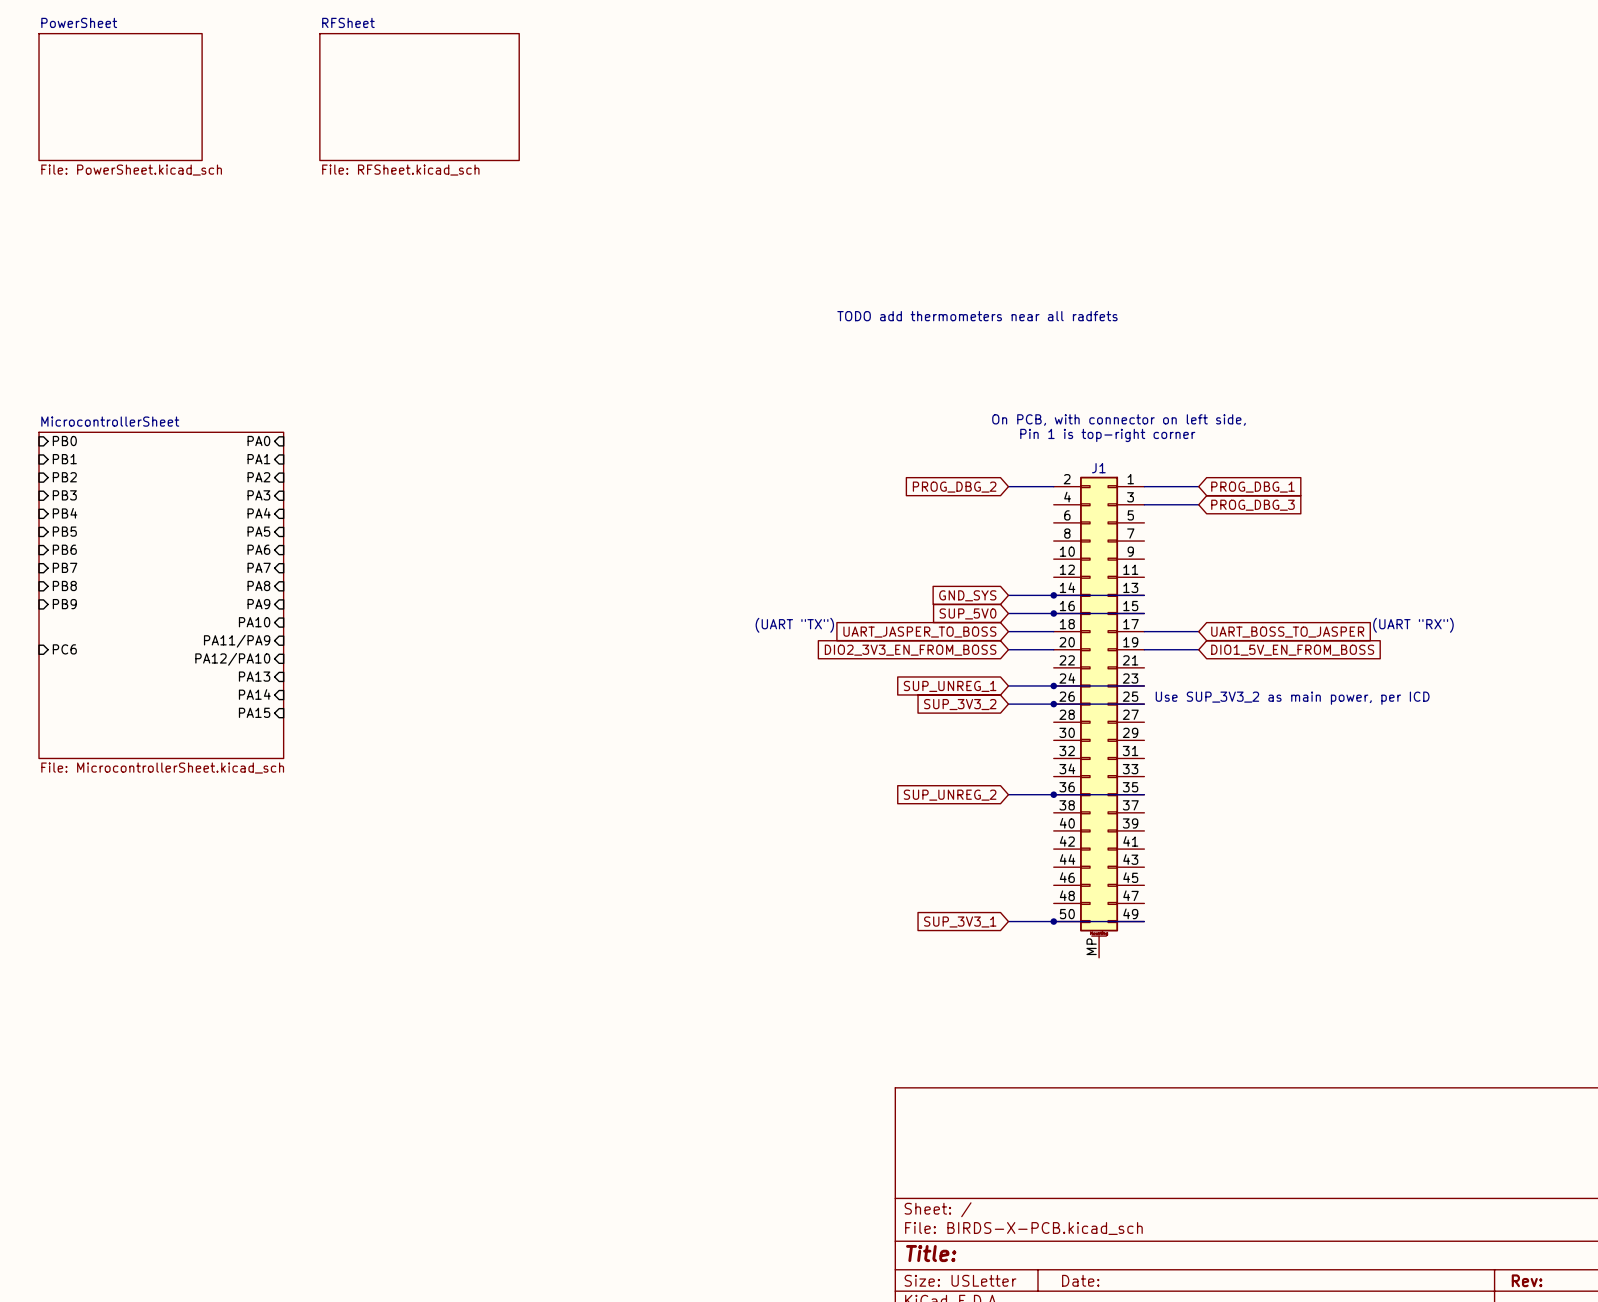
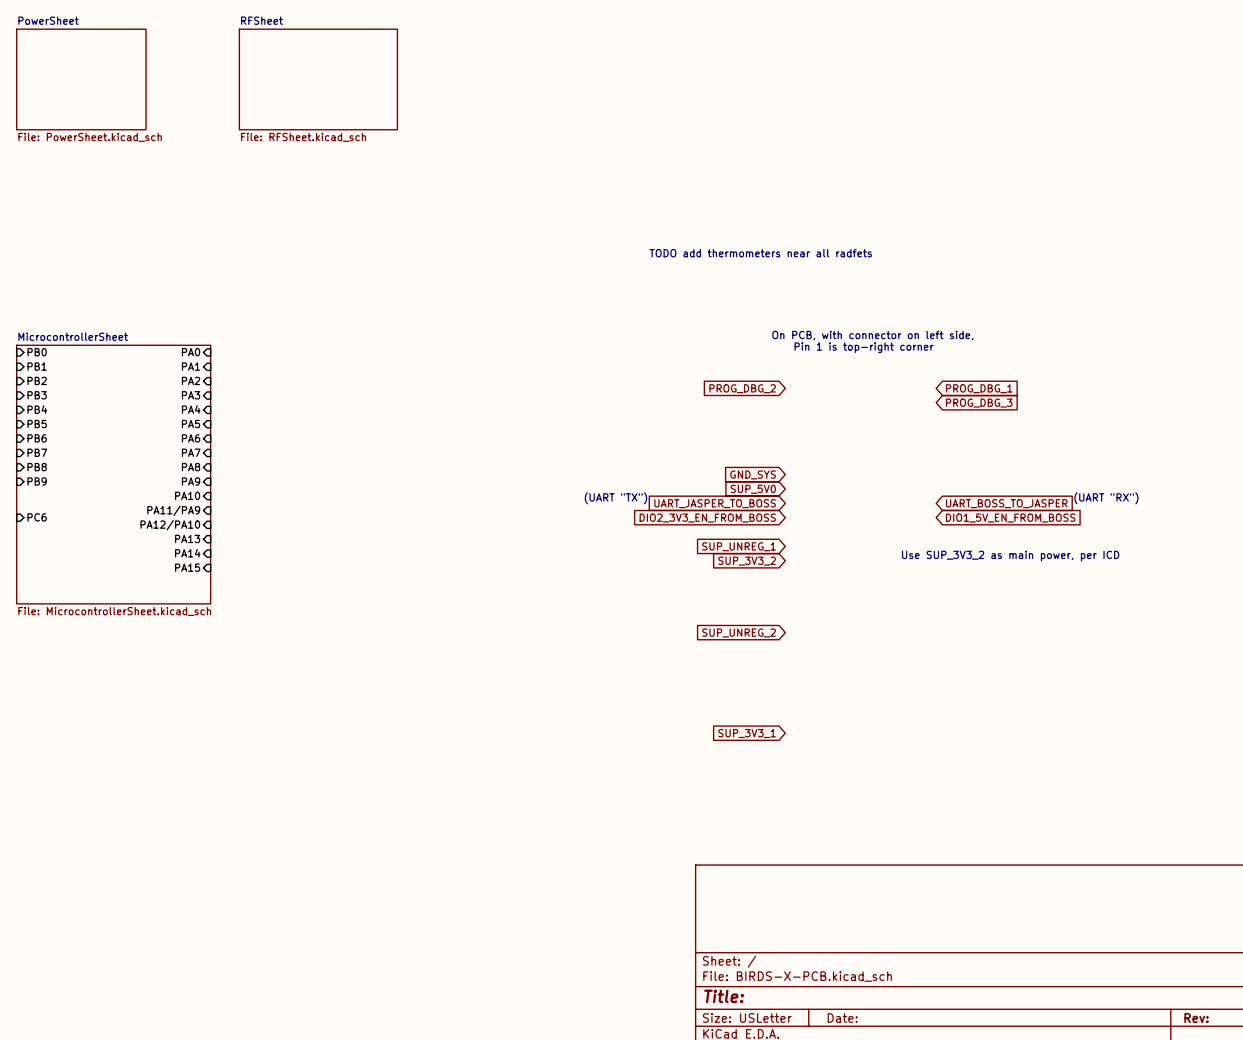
wire: (1008, 486) (1053, 486) -> none
wire: (1144, 486) (1198, 486) -> none
wire: (1144, 504) (1198, 504) -> none
wire: (1008, 595) (1144, 595) -> none
junction: (1053, 595) -> none
wire: (1008, 613) (1144, 613) -> none
junction: (1053, 613) -> none
wire: (1008, 631) (1053, 631) -> none
wire: (1144, 631) (1198, 631) -> none
wire: (1008, 649) (1053, 649) -> none
wire: (1144, 649) (1198, 649) -> none
wire: (1008, 685) (1144, 685) -> none
junction: (1053, 685) -> none
wire: (1008, 704) (1144, 704) -> none
junction: (1053, 704) -> none
J1: (1099, 717) -> none
wire: (1008, 794) (1144, 794) -> none
junction: (1053, 794) -> none
wire: (1008, 921) (1144, 921) -> none
junction: (1053, 921) -> none

